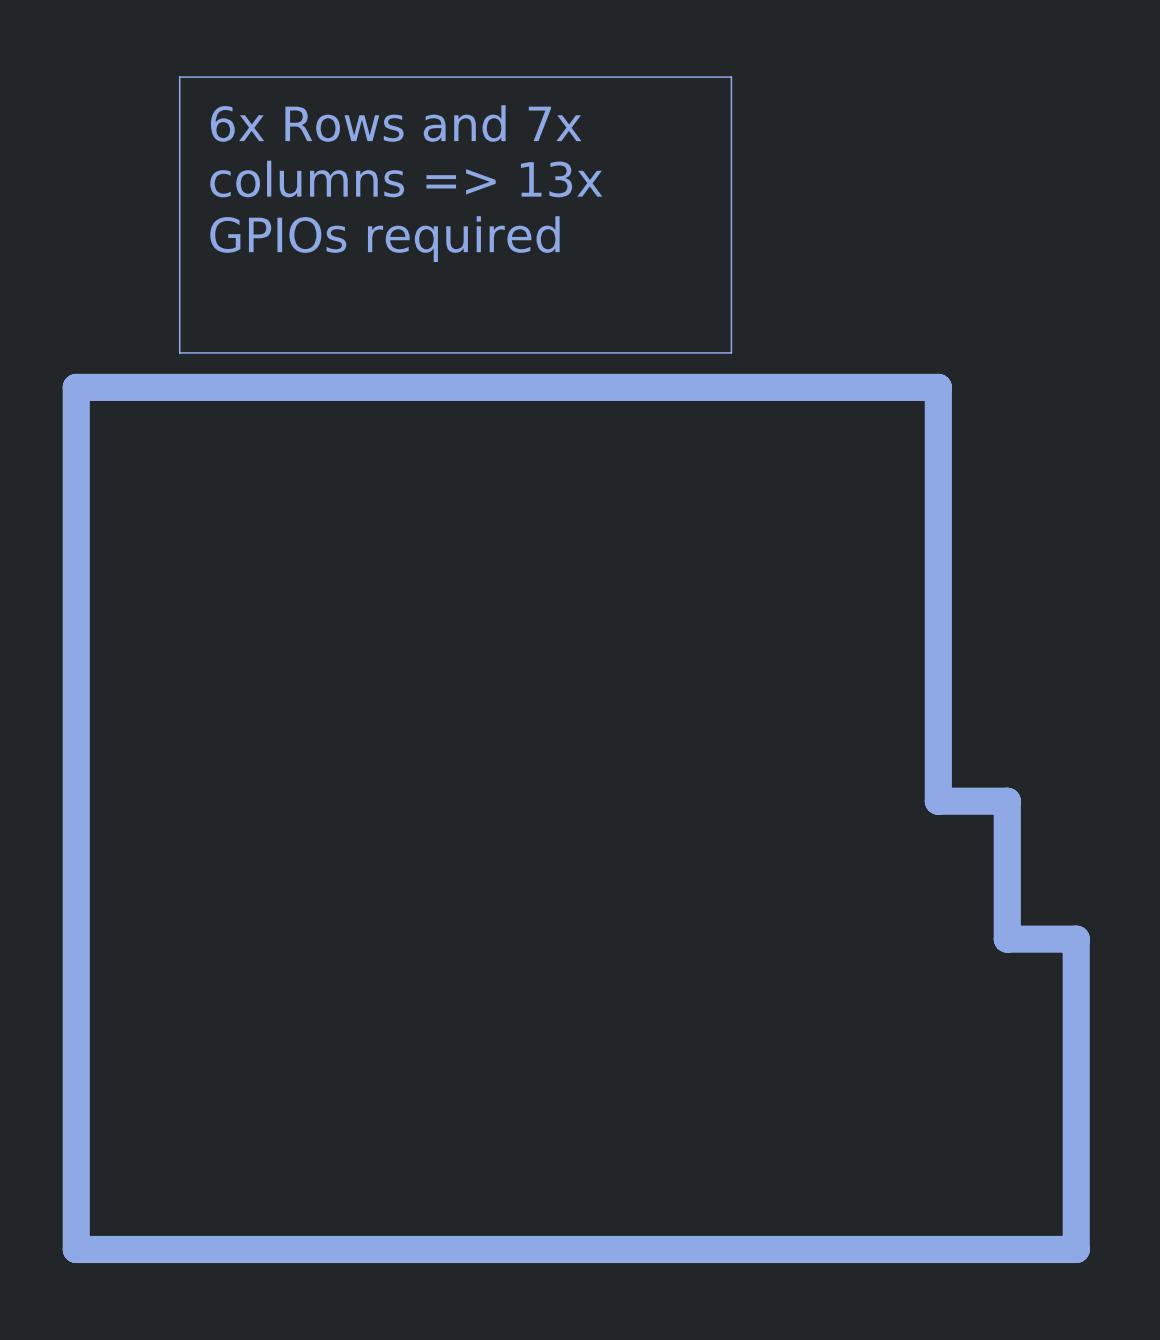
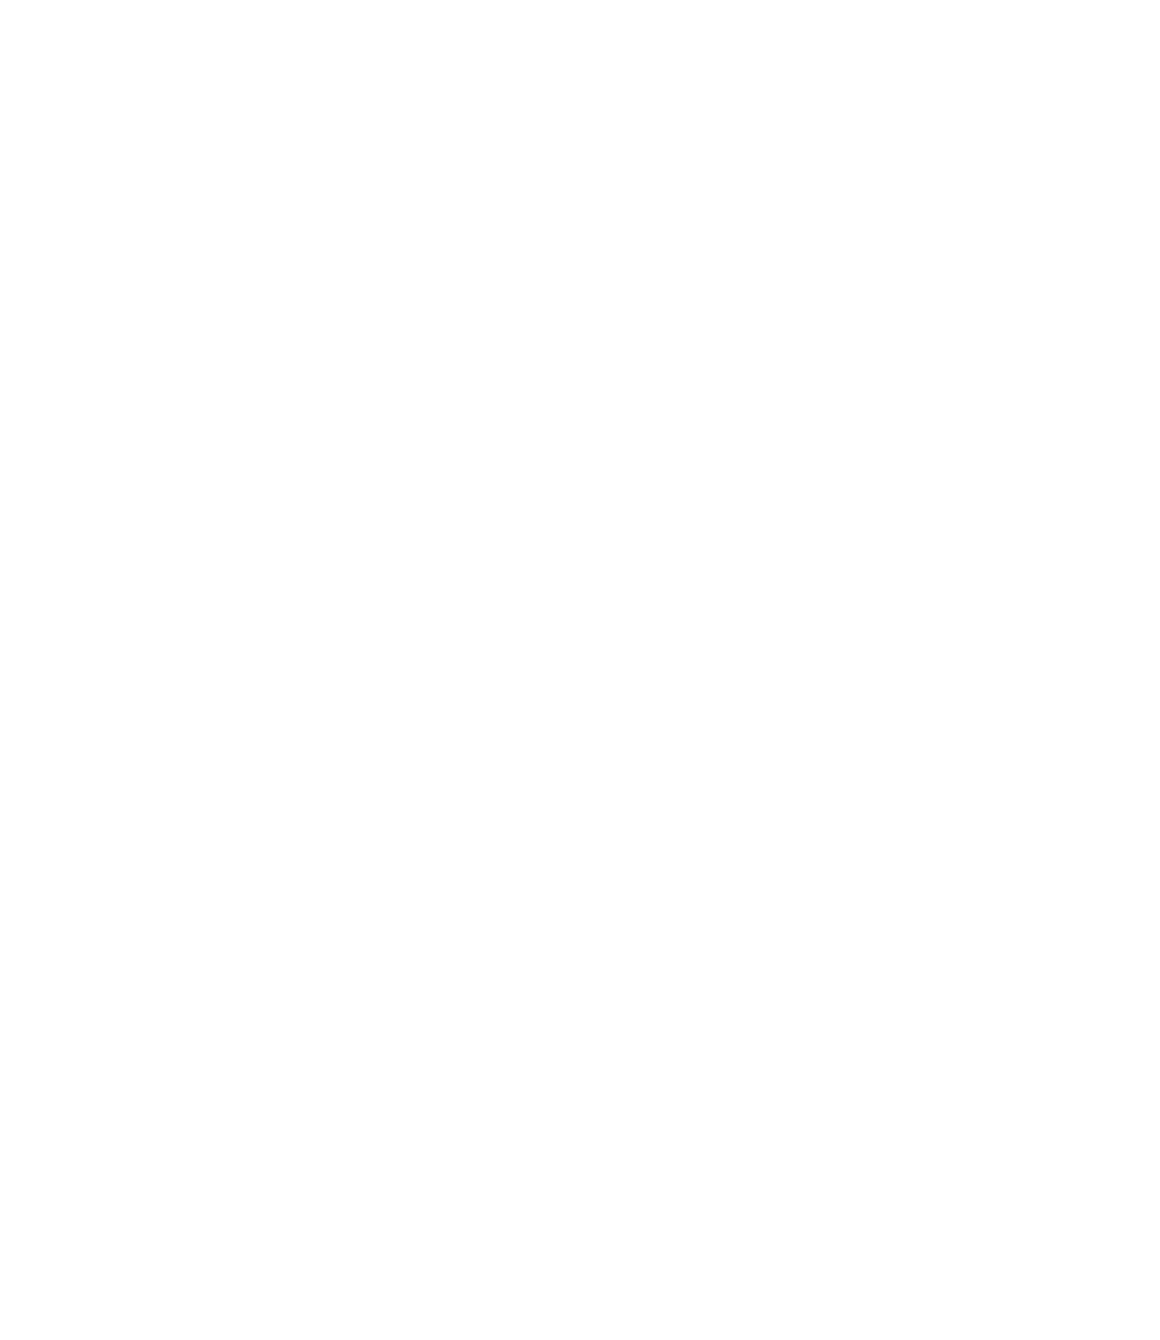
line: (179, 77) (731, 77) (731, 352) (179, 352) (179, 77) -> none
text: 6x Rows and 7x (396, 123) -> none
text: columns => 13x (406, 179) -> none
text: GPIOs required (384, 239) -> none
line: (76, 387) (76, 1249) (1076, 1249) (1076, 939) (1007, 939) (1007, 801) (938, 801) (938, 387) (76, 387) -> none

